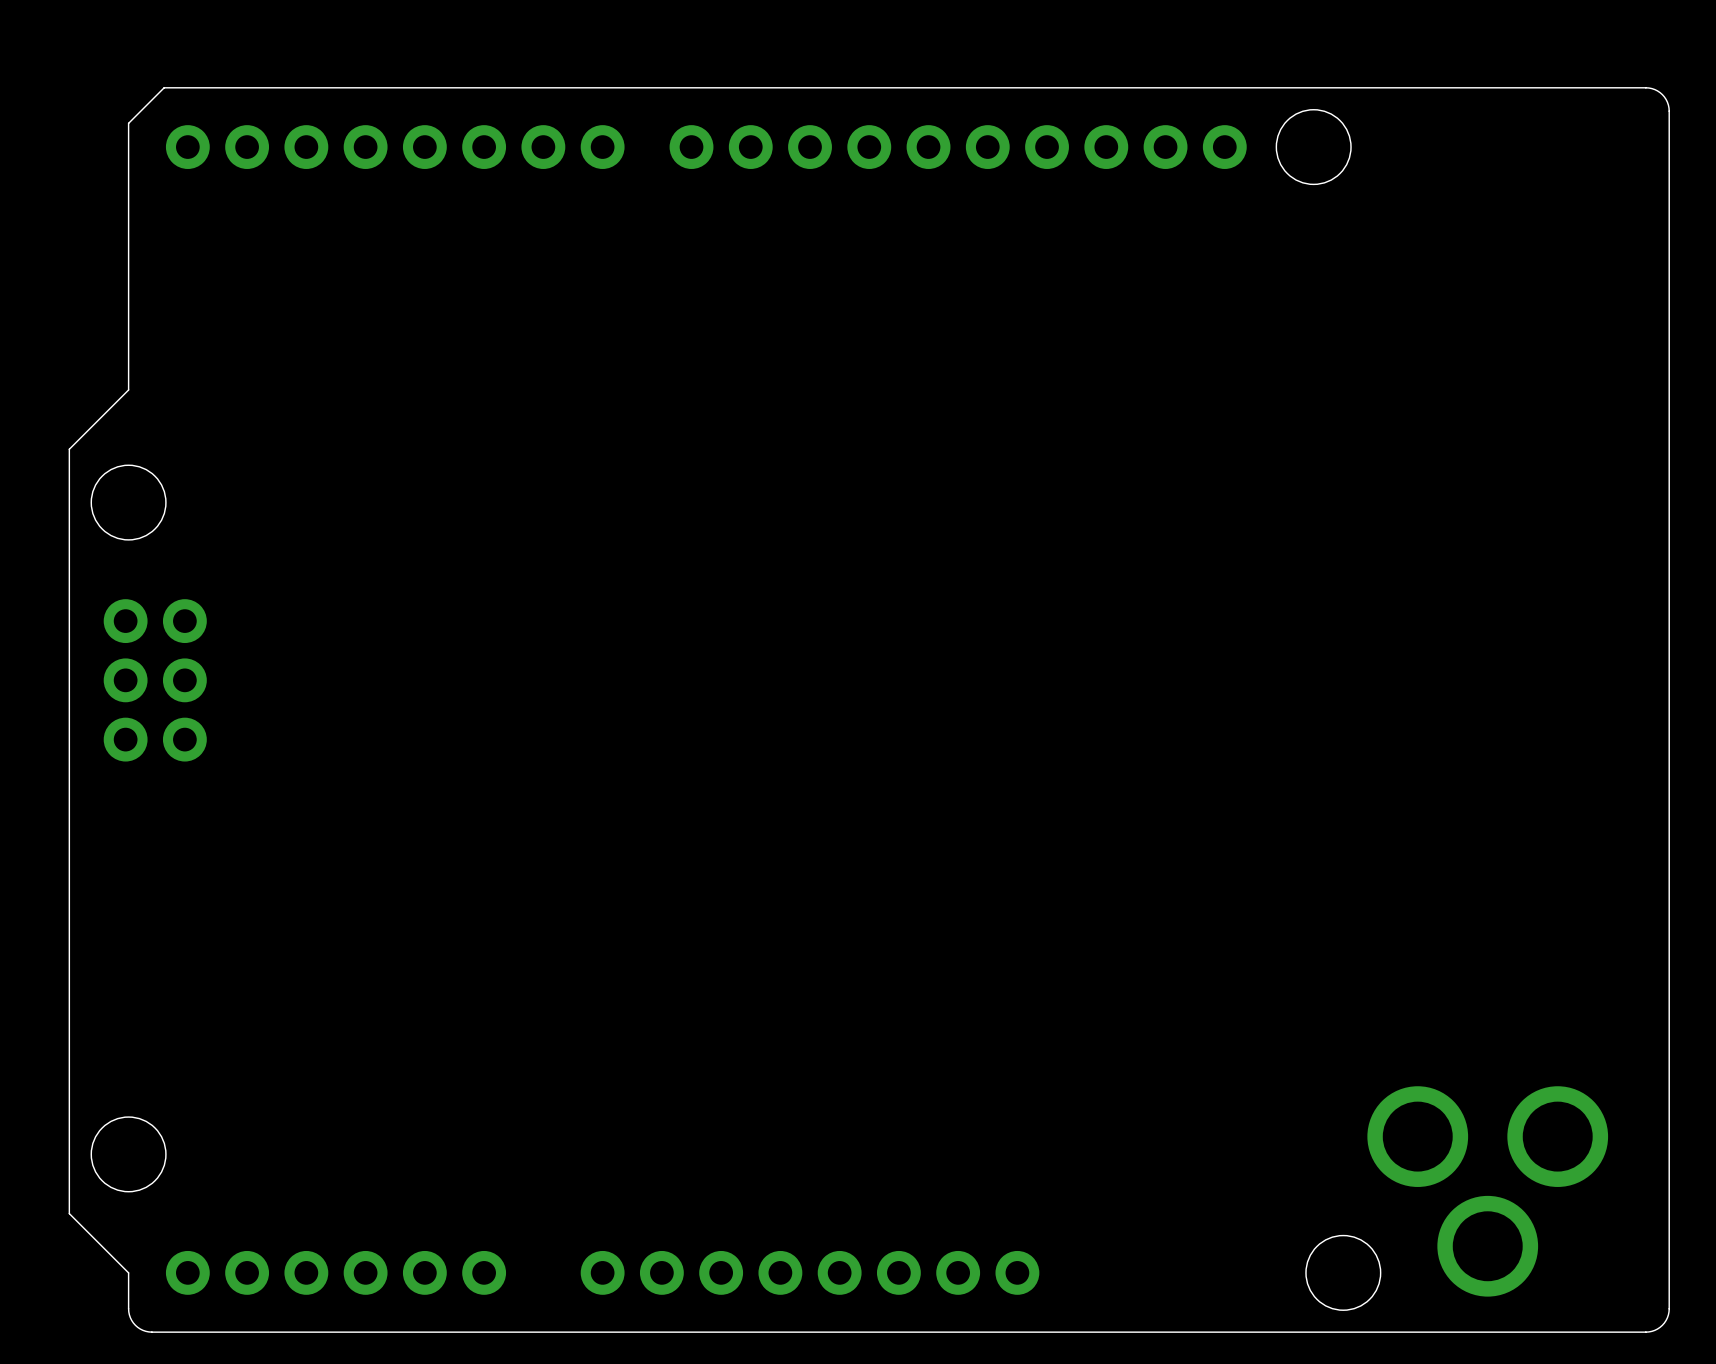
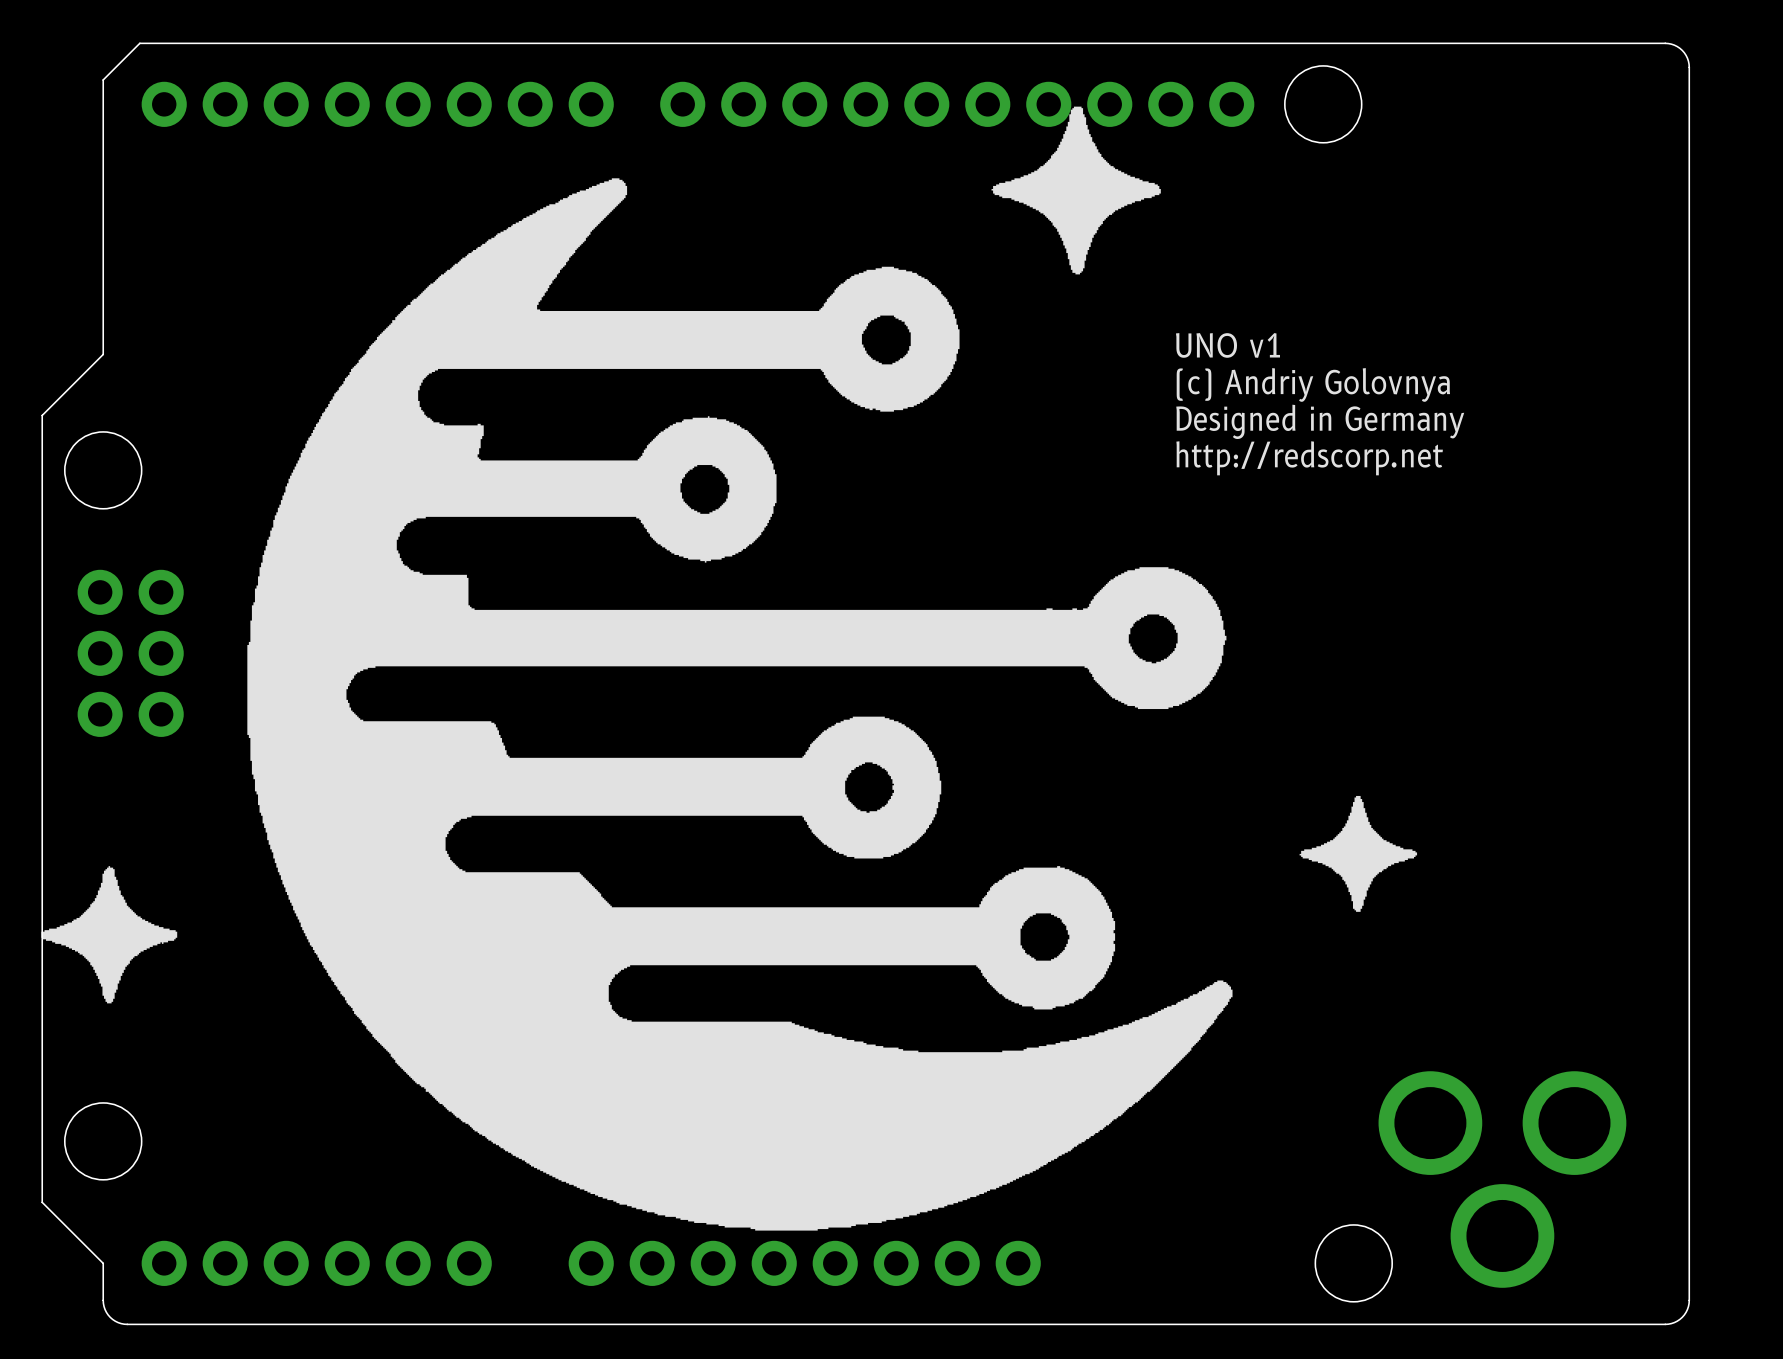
drawing: none -> [41, 106, 1418, 1231]
text: none -> UNO v1 (1227, 345)
text: none -> (c) Andriy Golovnya (1313, 384)
text: none -> Designed in Germany (1320, 421)
text: none -> http://redscorp.net (1309, 458)

